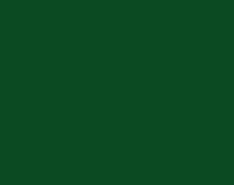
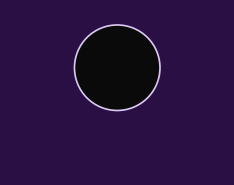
part: none -> (117, 67)

